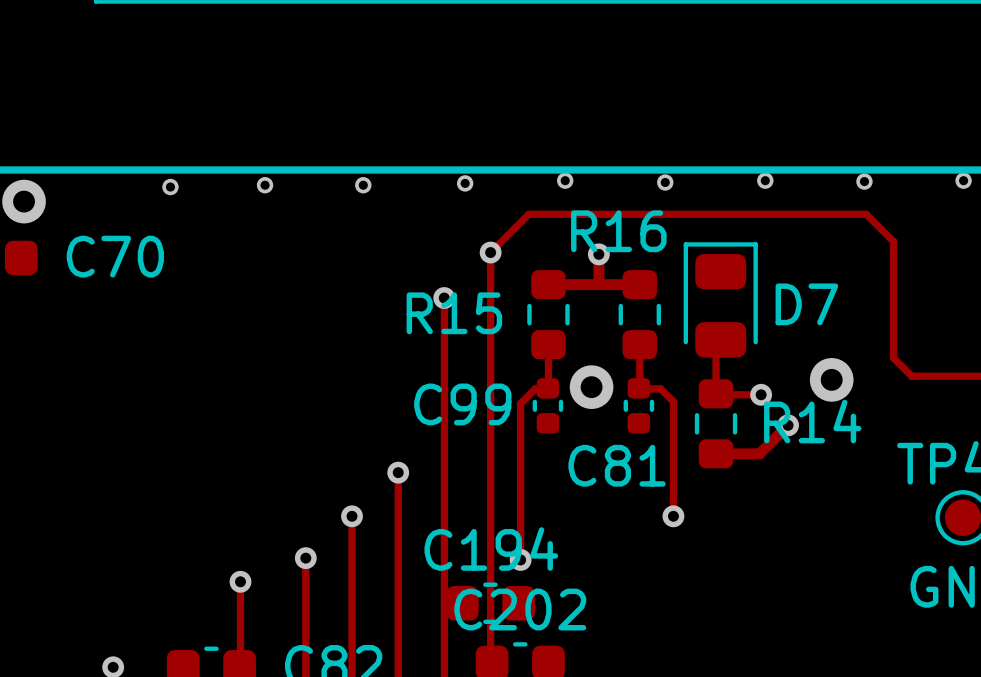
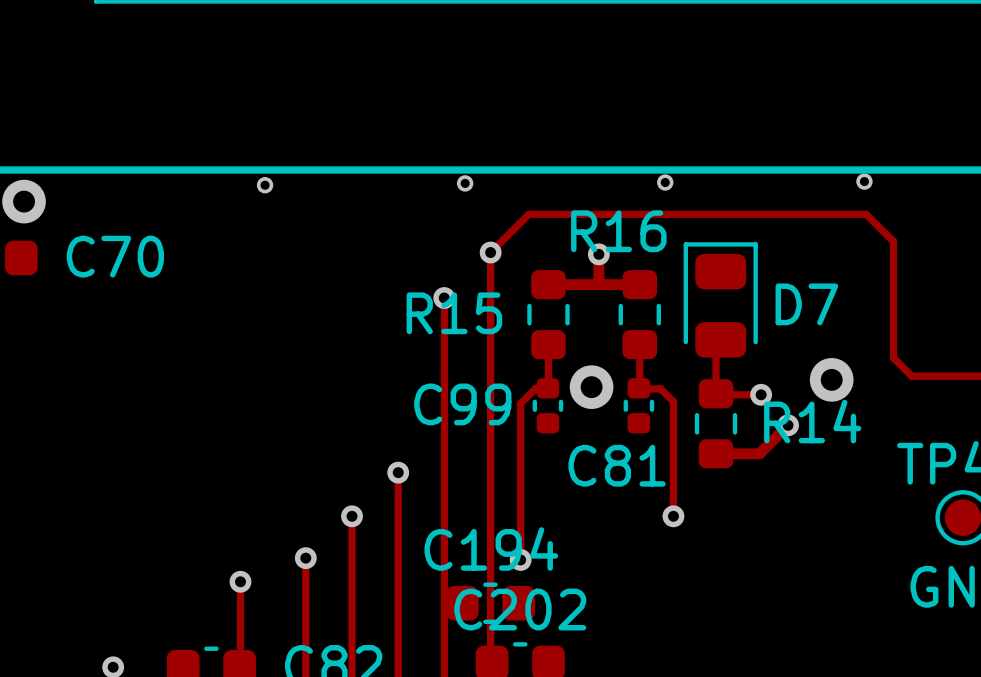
via: (565, 180) -> none
via: (765, 180) -> none
via: (963, 180) -> none
via: (363, 185) -> none
via: (170, 187) -> none

